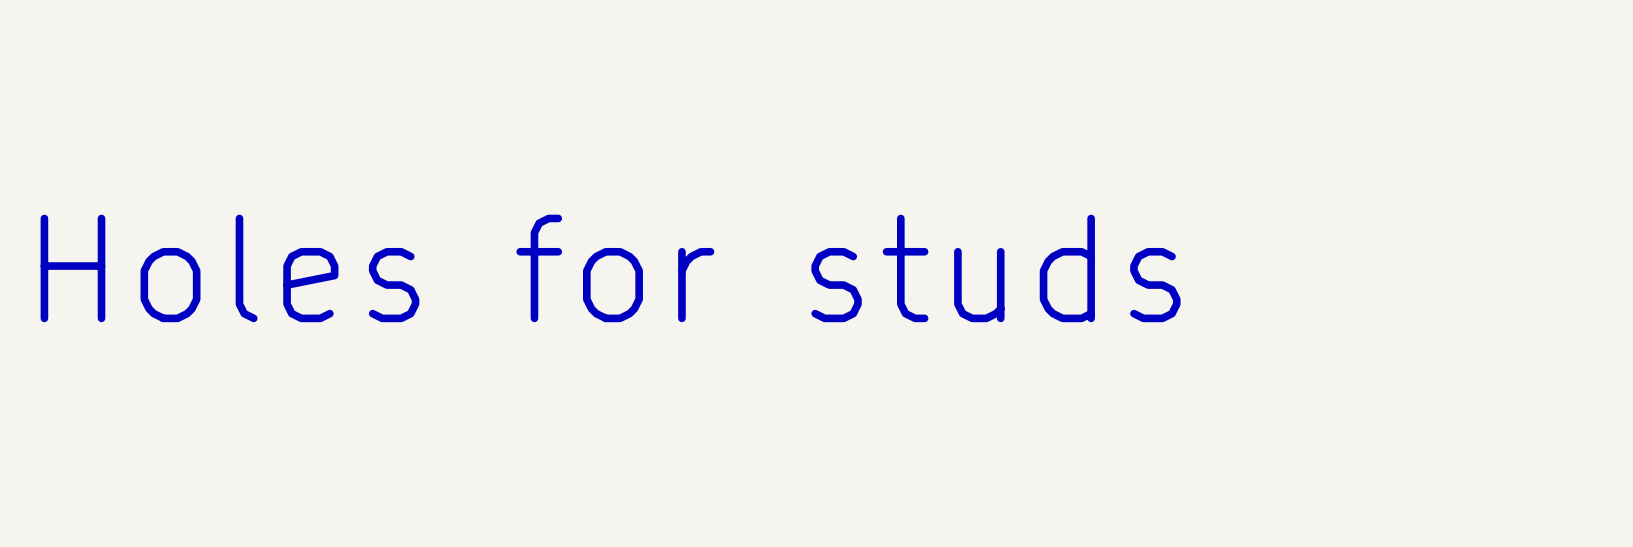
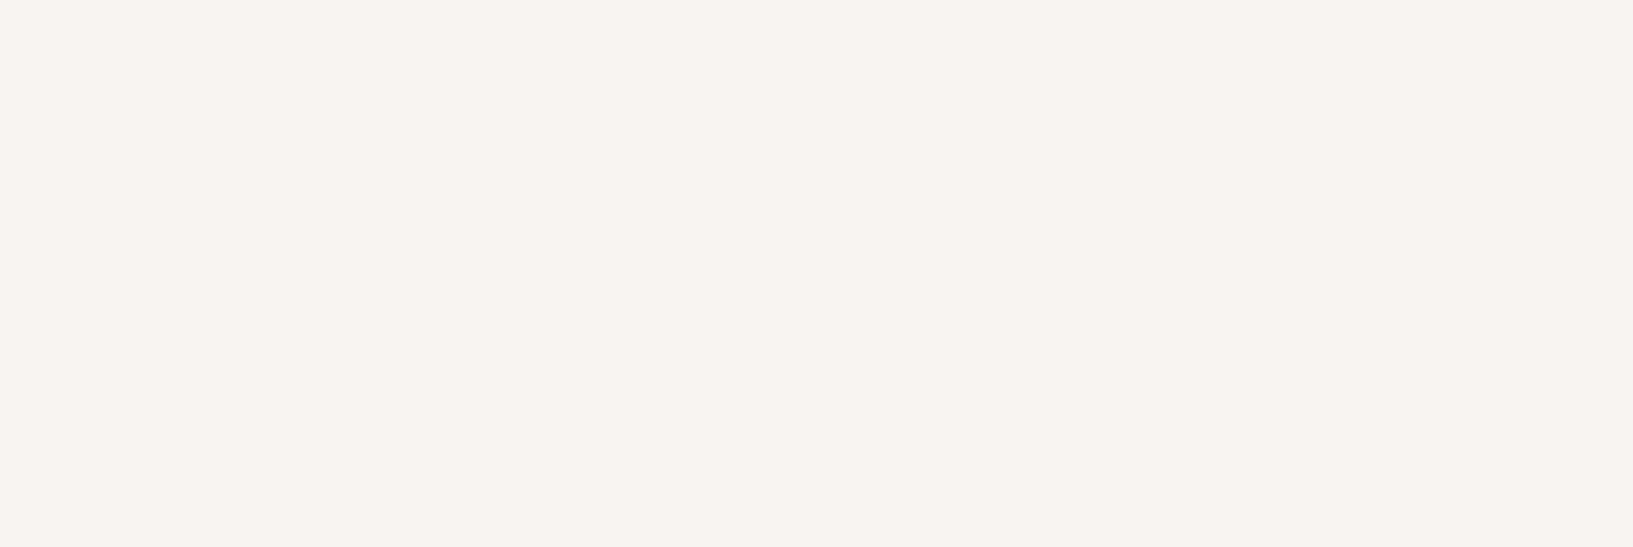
text: Holes for studs (610, 268) -> none

